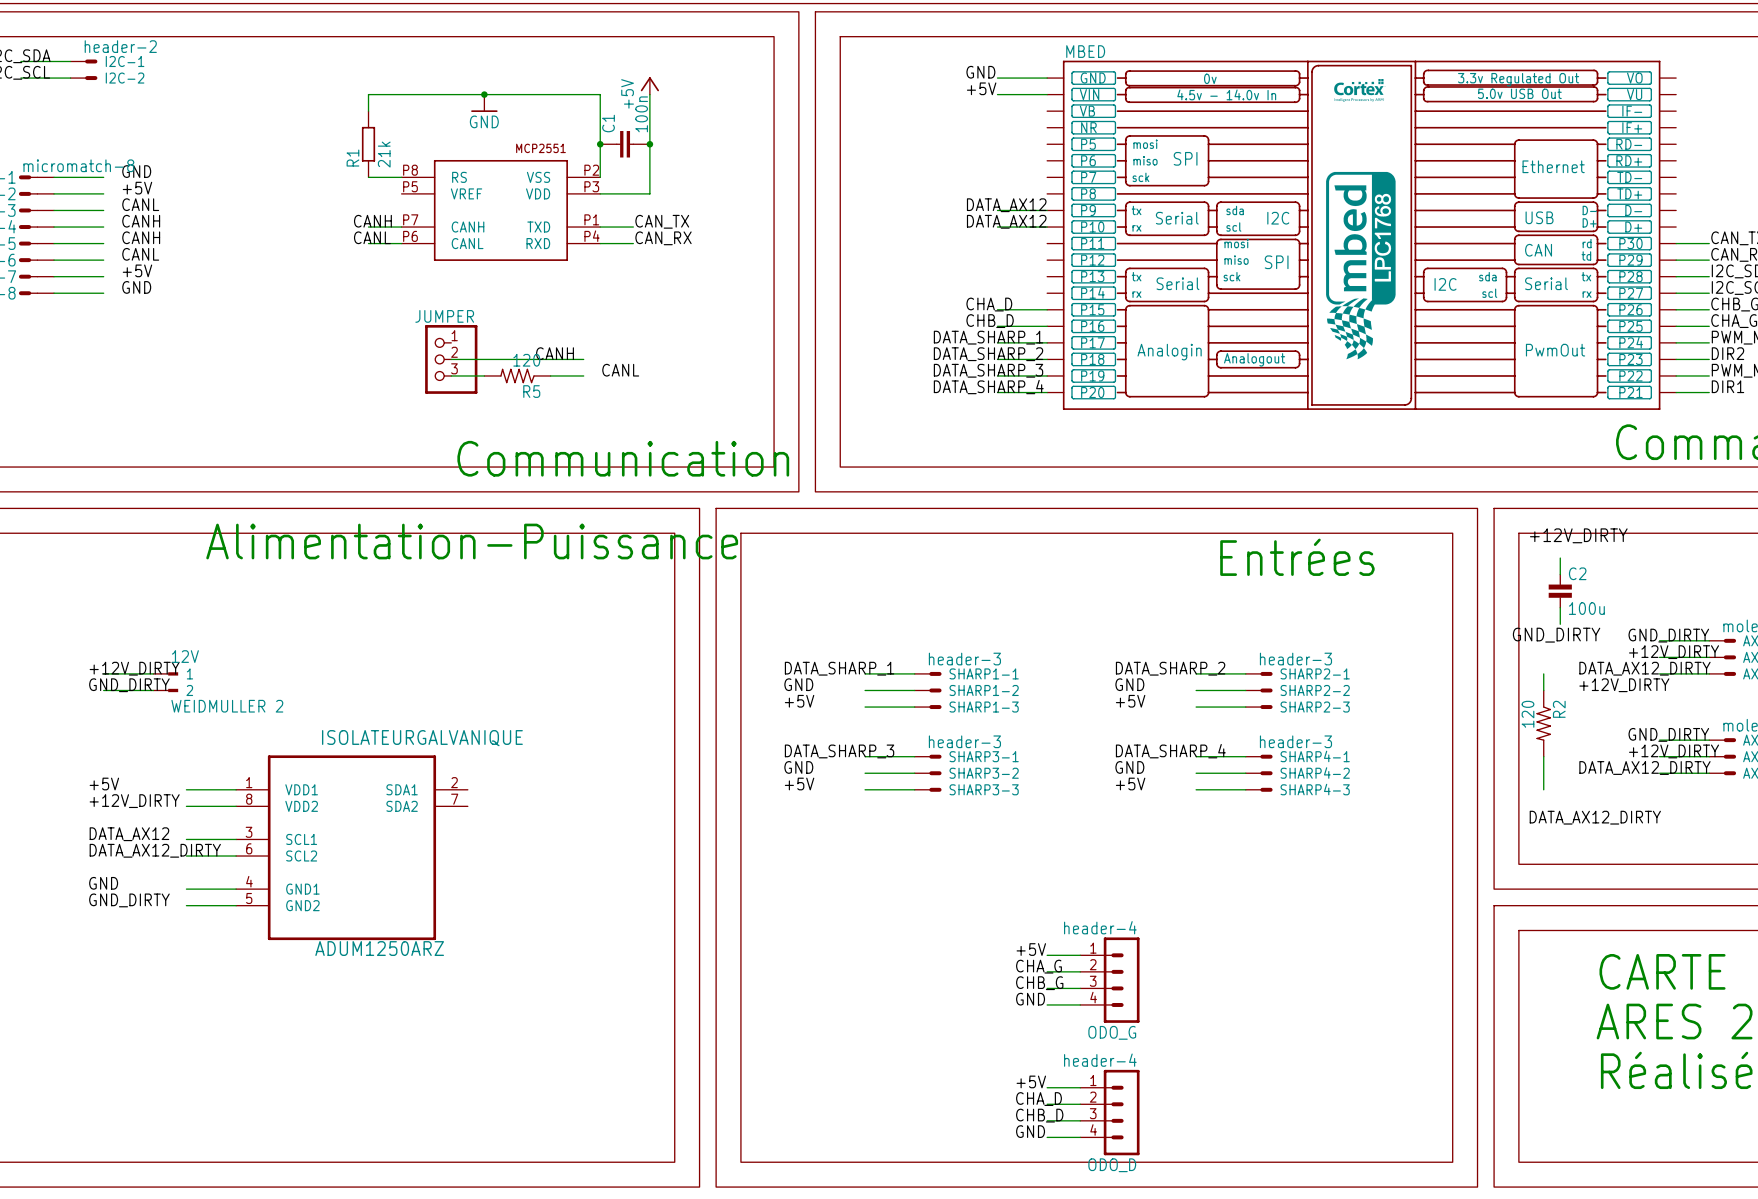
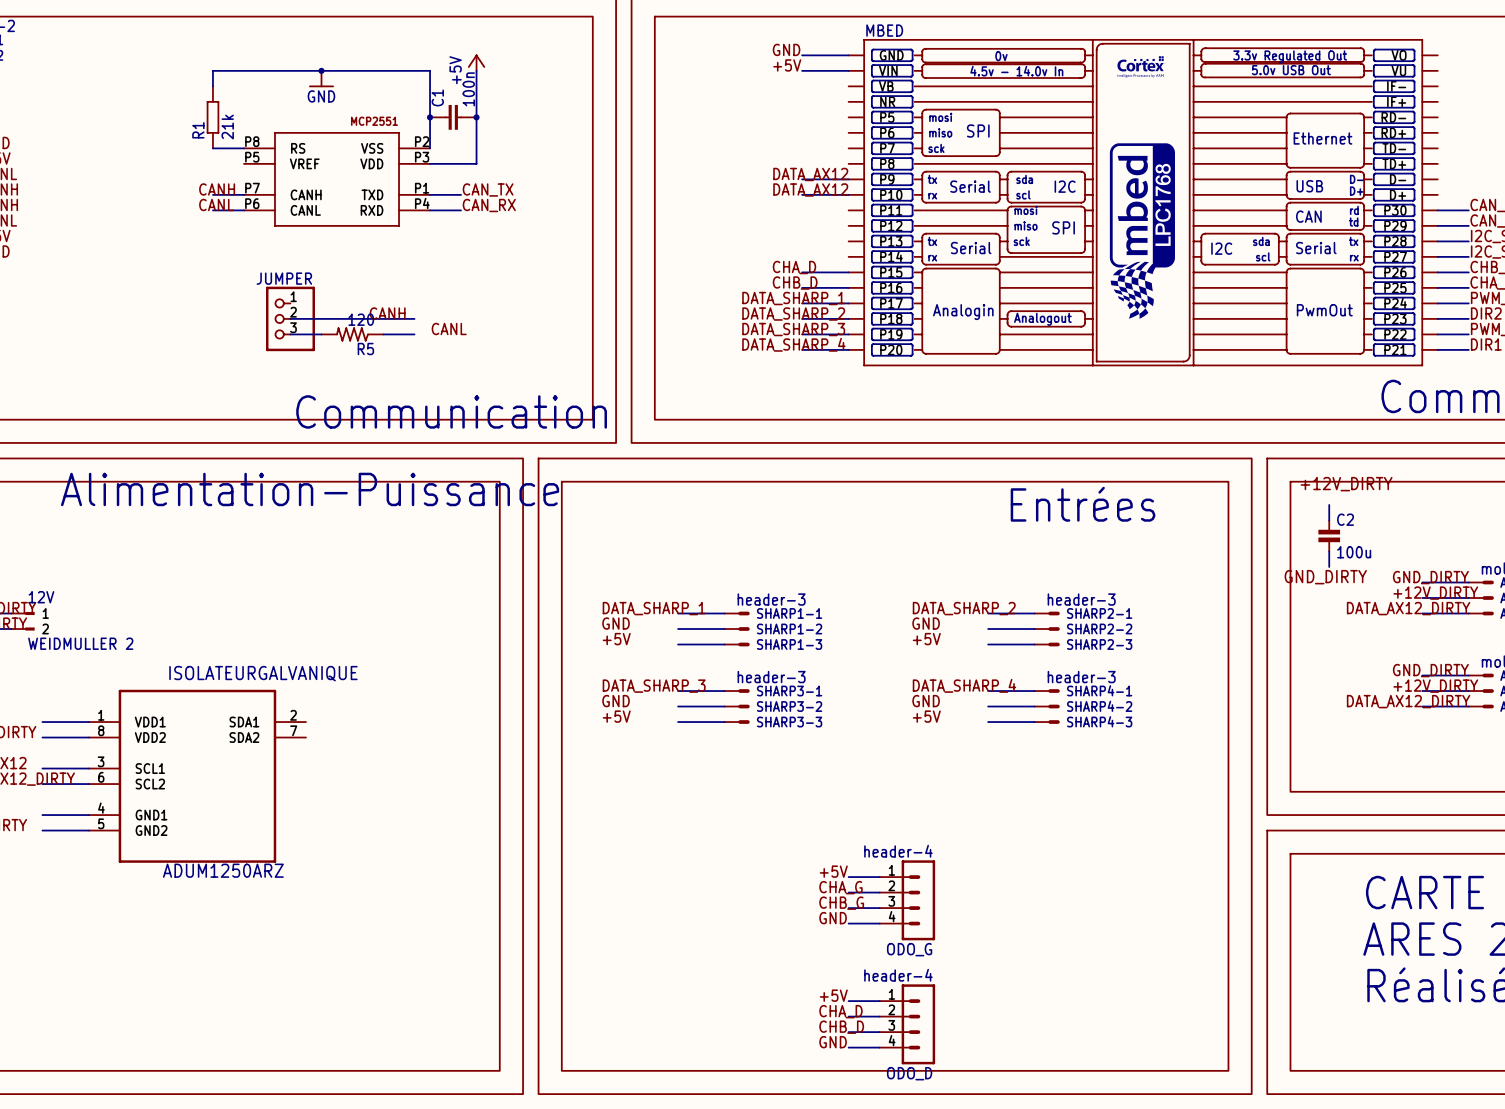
wire: (1543, 673) (1543, 690) -> none
label: +12V_DIRTY (1624, 685) -> none
R2: 120 (1543, 723) -> none
wire: (1543, 756) (1543, 789) -> none
label: DATA_AX12_DIRTY (1595, 817) -> none

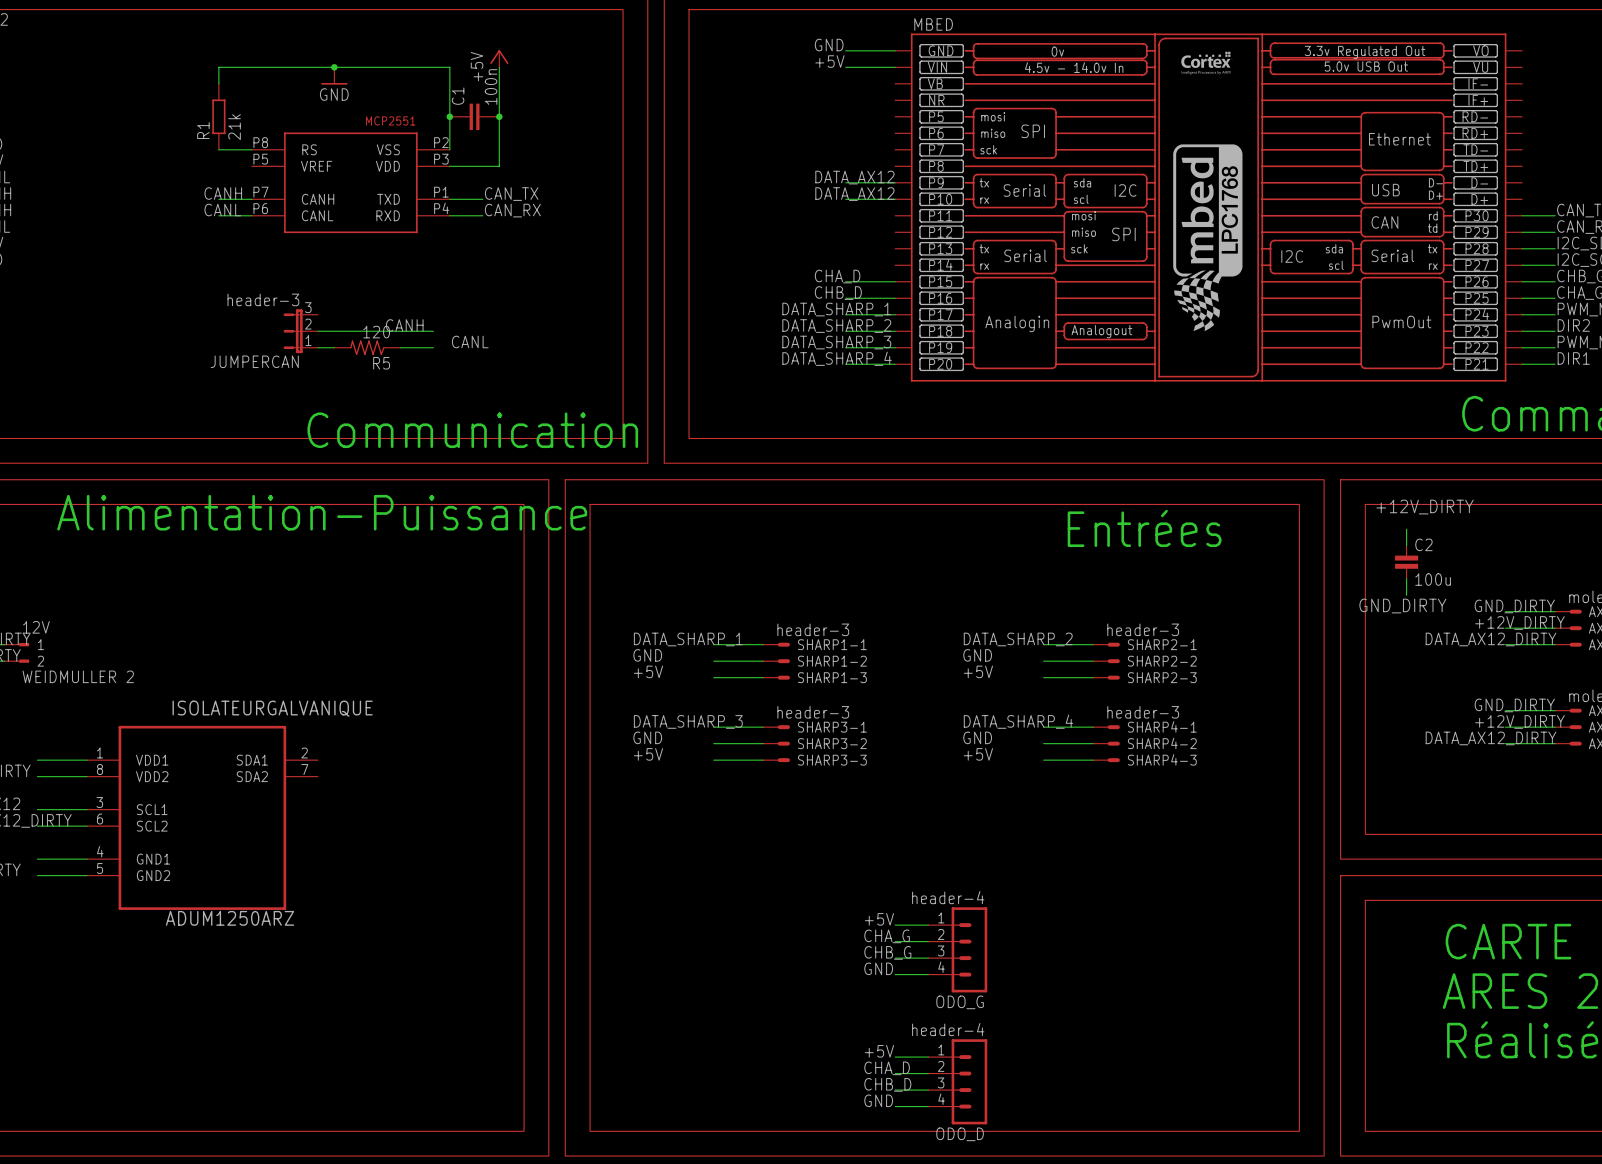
JUMPERCAN: none -> header-3 (300, 331)
JUMPER: (290, 318) -> none

